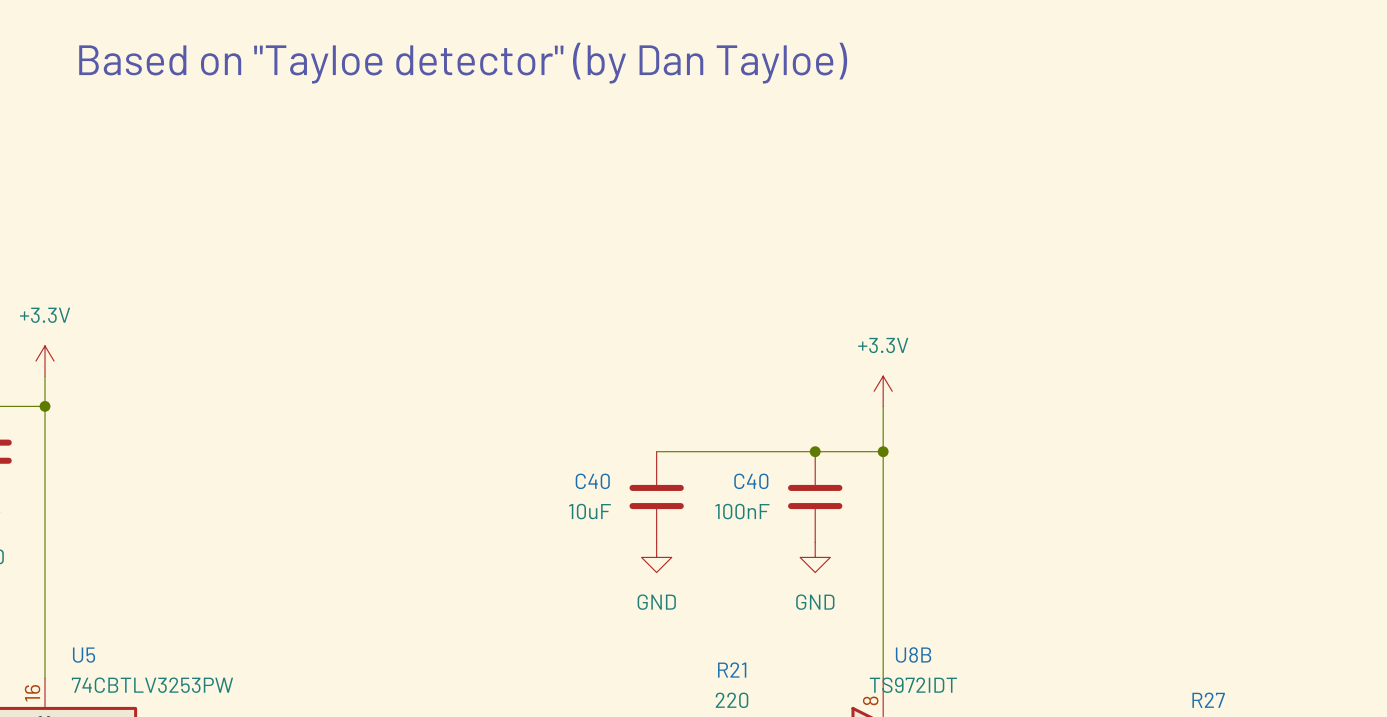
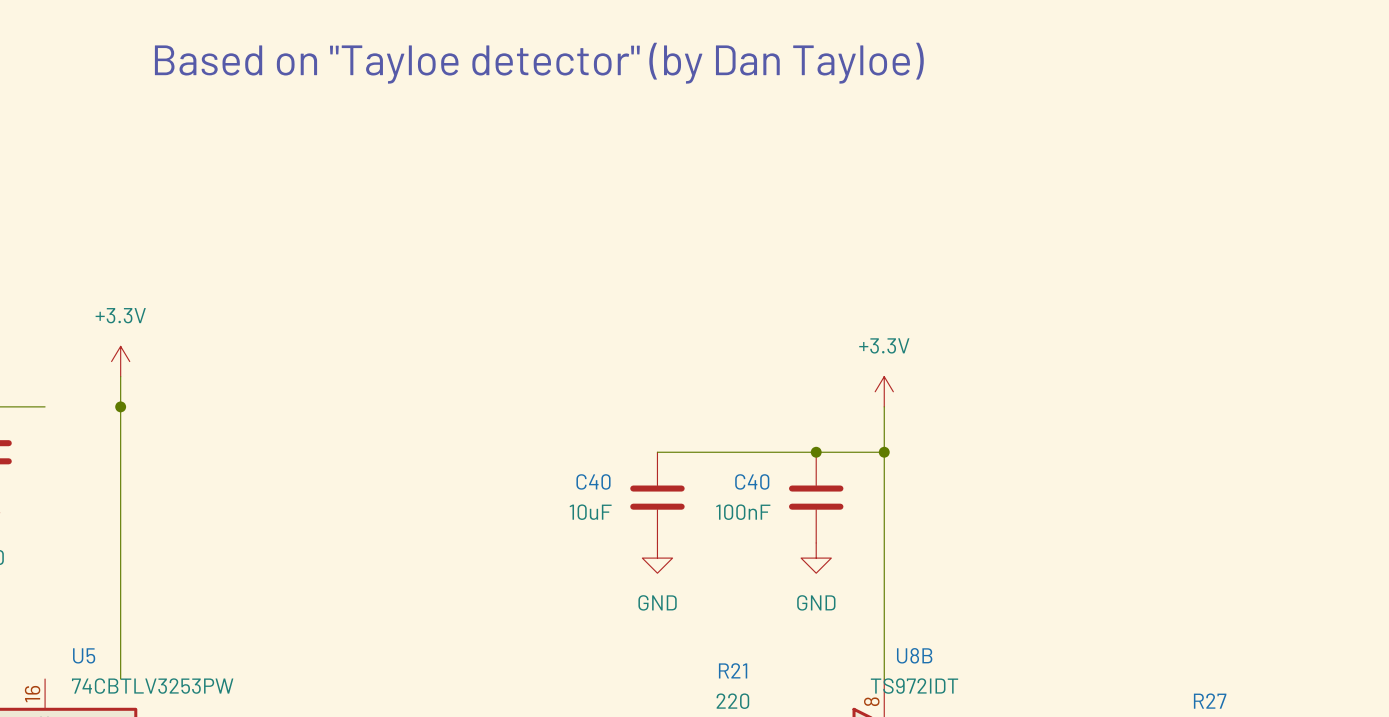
text position: Based on "Tayloe detector" (by Dan Tayloe) (463, 63) -> Based on "Tayloe detector" (by Dan Tayloe) (539, 63)
power symbol position: +3.3V (45, 361) -> +3.3V (120, 361)
wire: (45, 376) (45, 678) -> (120, 376) (120, 679)
junction: (45, 406) -> none
junction: none -> (120, 406)

